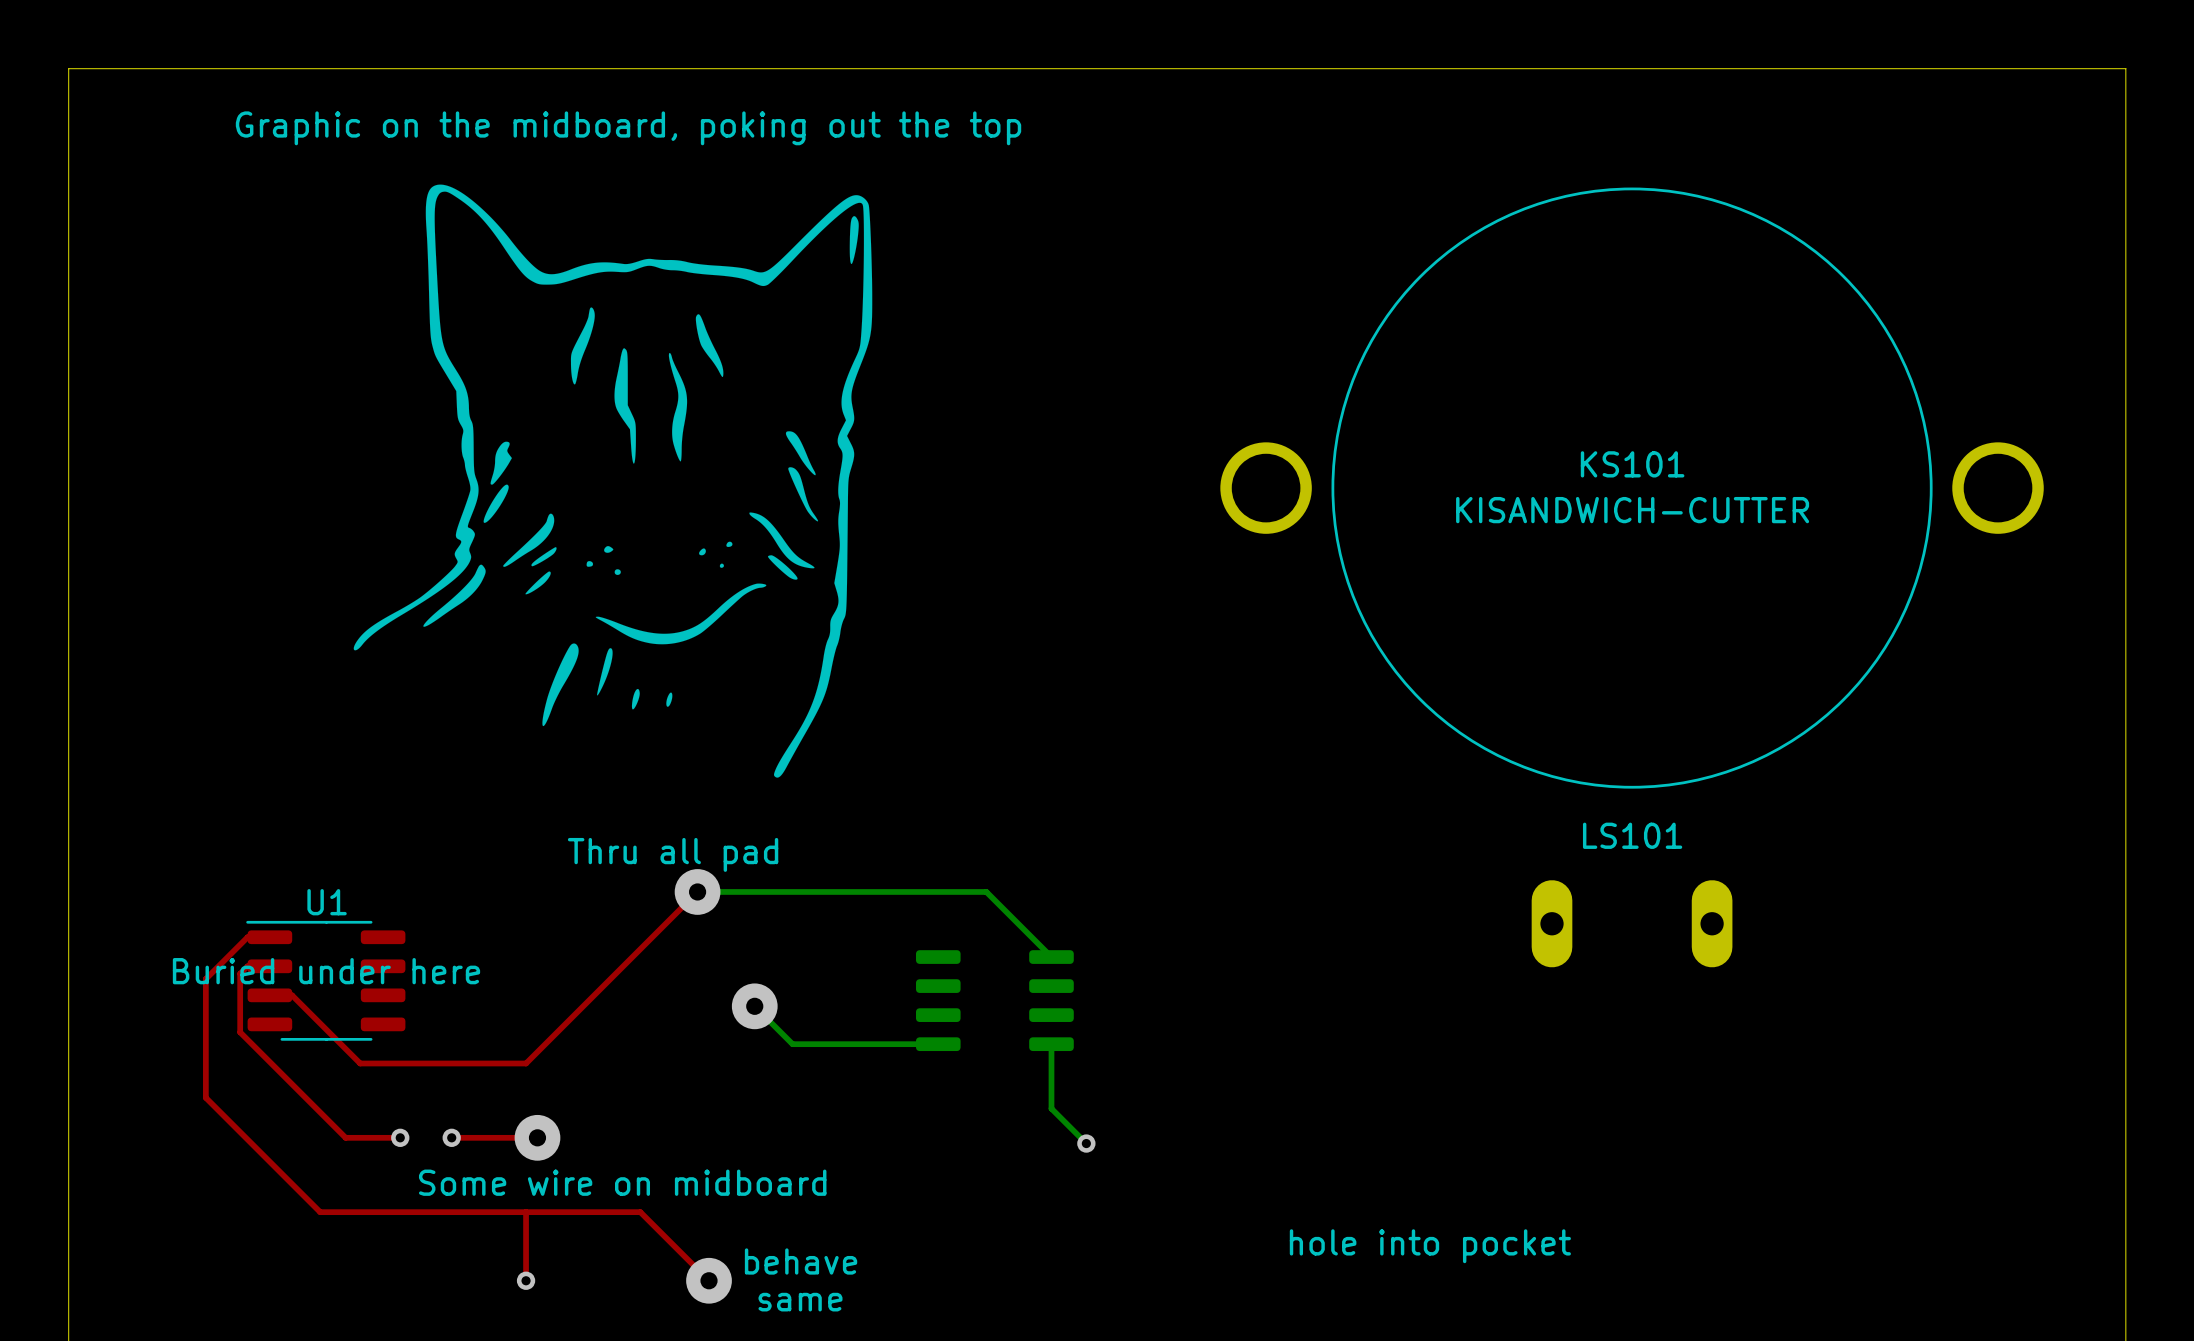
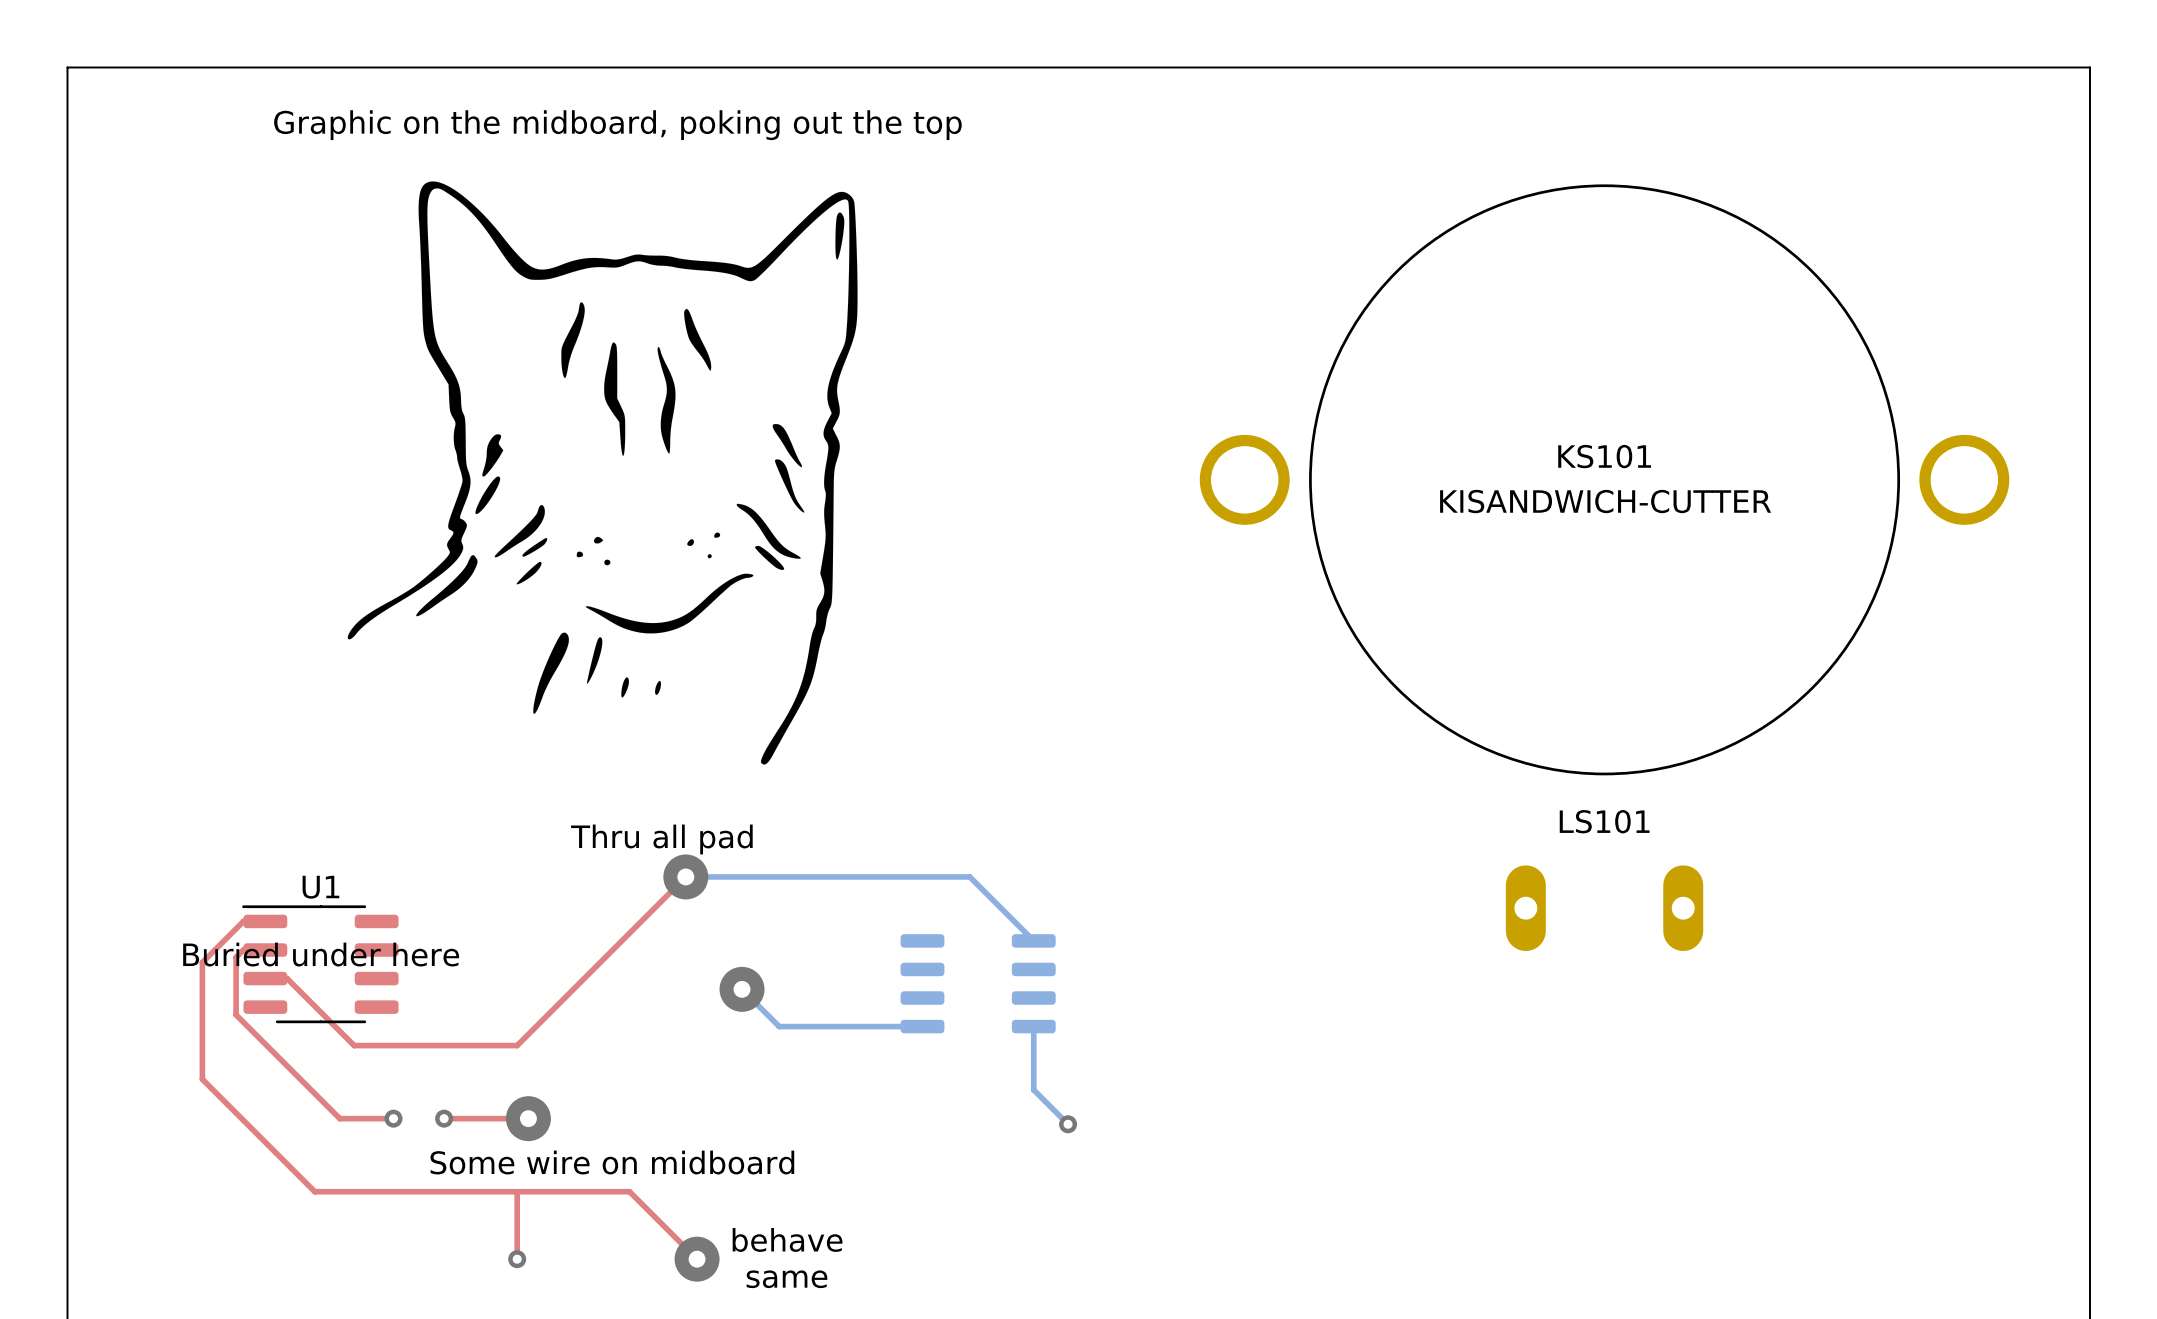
text: hole into pocket (1430, 1246) -> none

